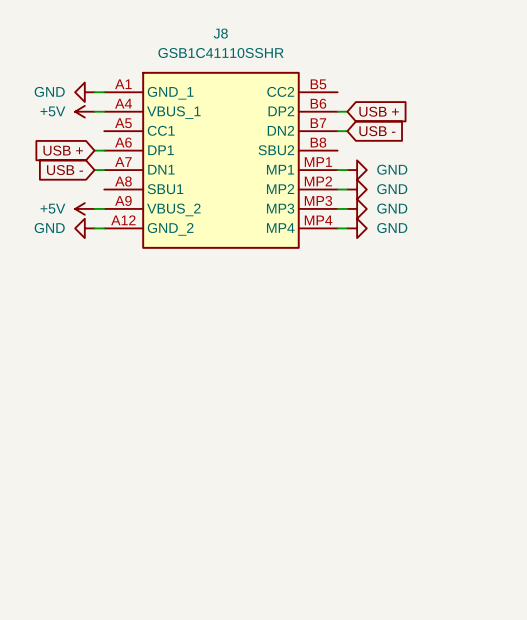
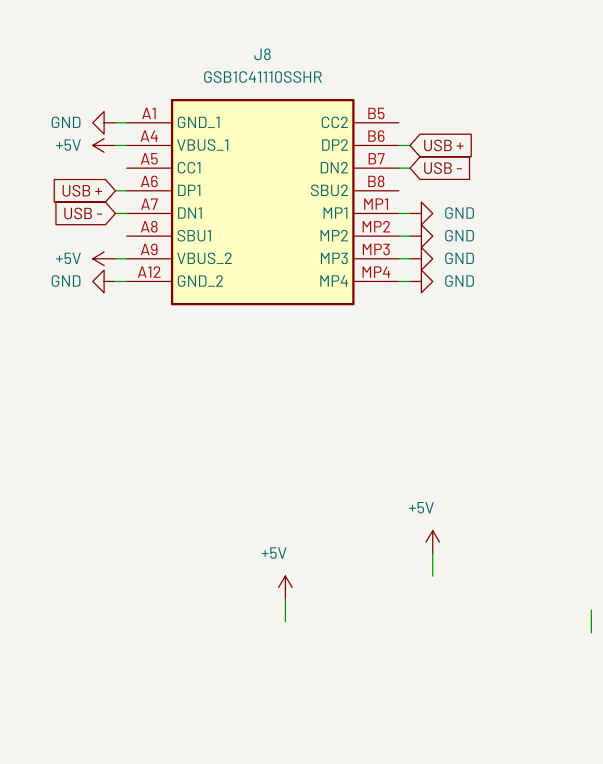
power symbol: none -> +5V (432, 542)
wire: none -> (432, 553) (432, 576)
power symbol: none -> +5V (285, 587)
wire: none -> (285, 598) (285, 621)
wire: none -> (591, 610) (591, 632)

